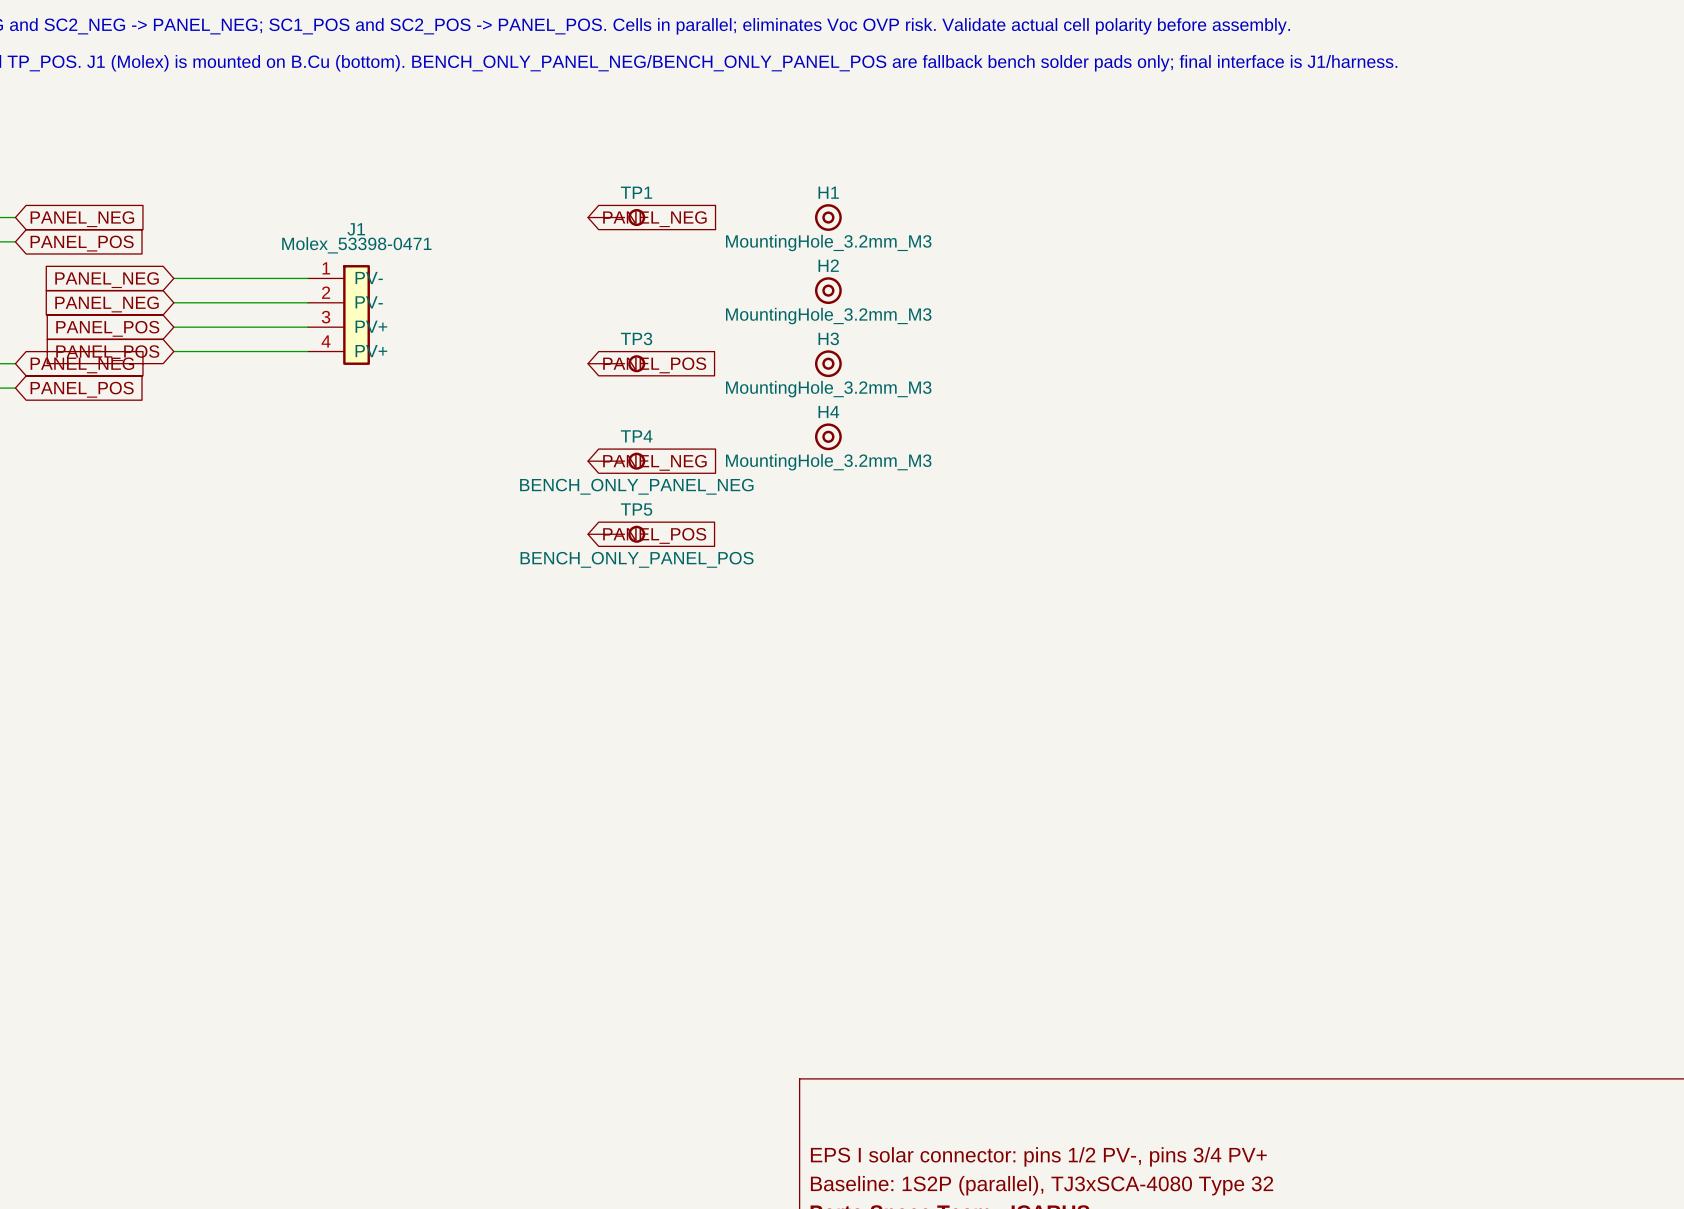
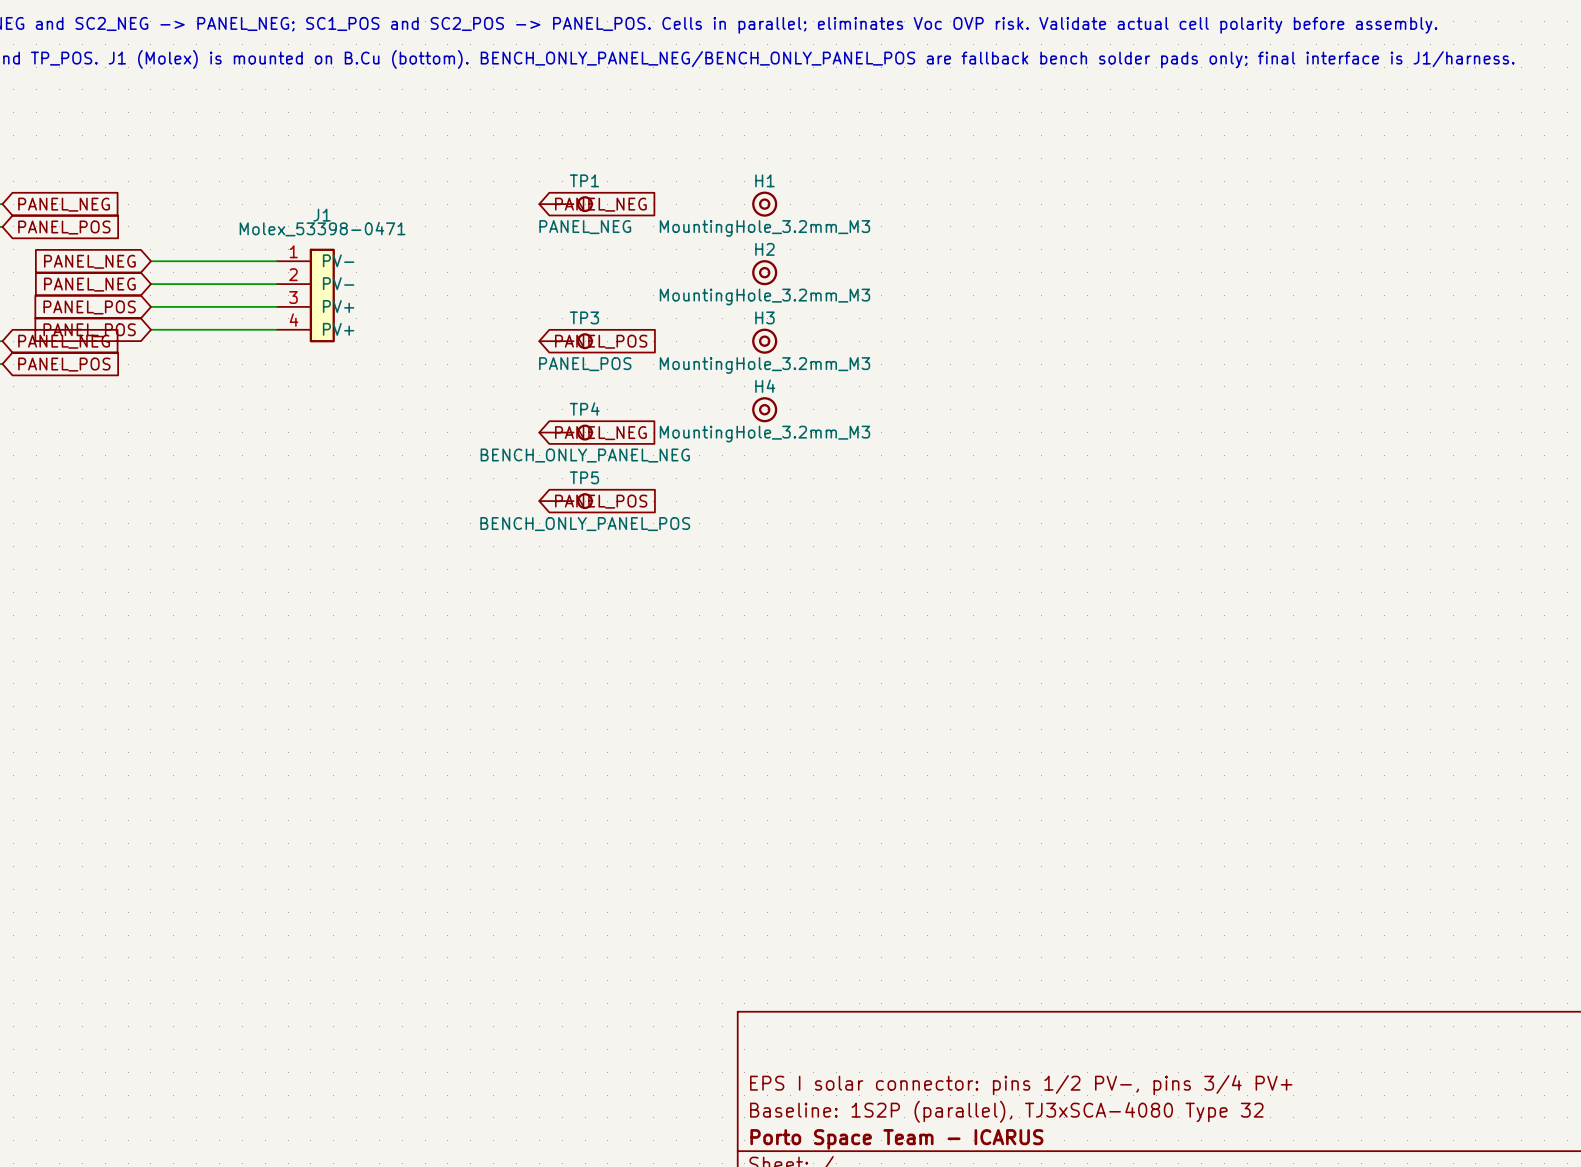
TP1 value: none -> PANEL_NEG (585, 227)
TP3 value: none -> PANEL_POS (585, 364)

